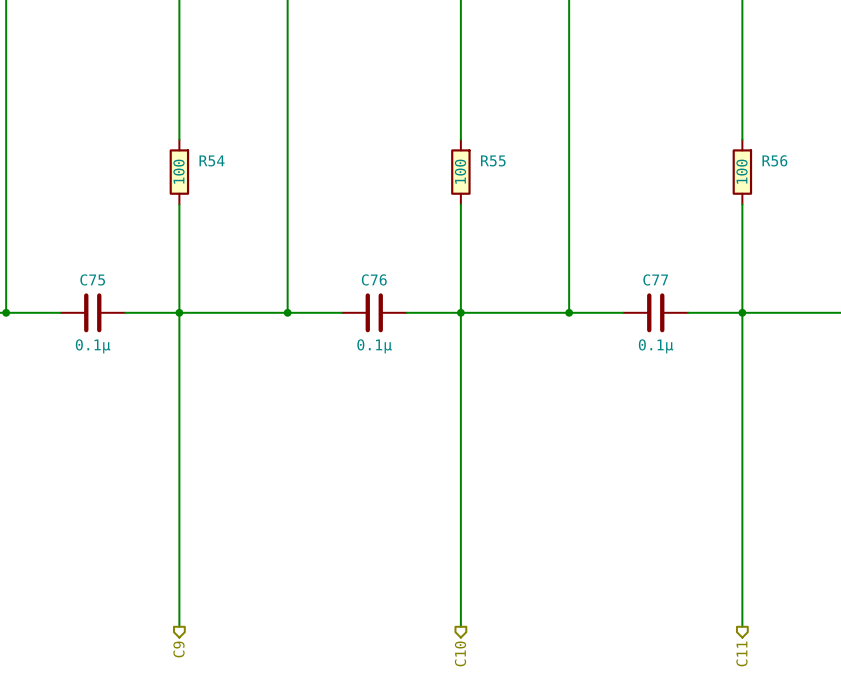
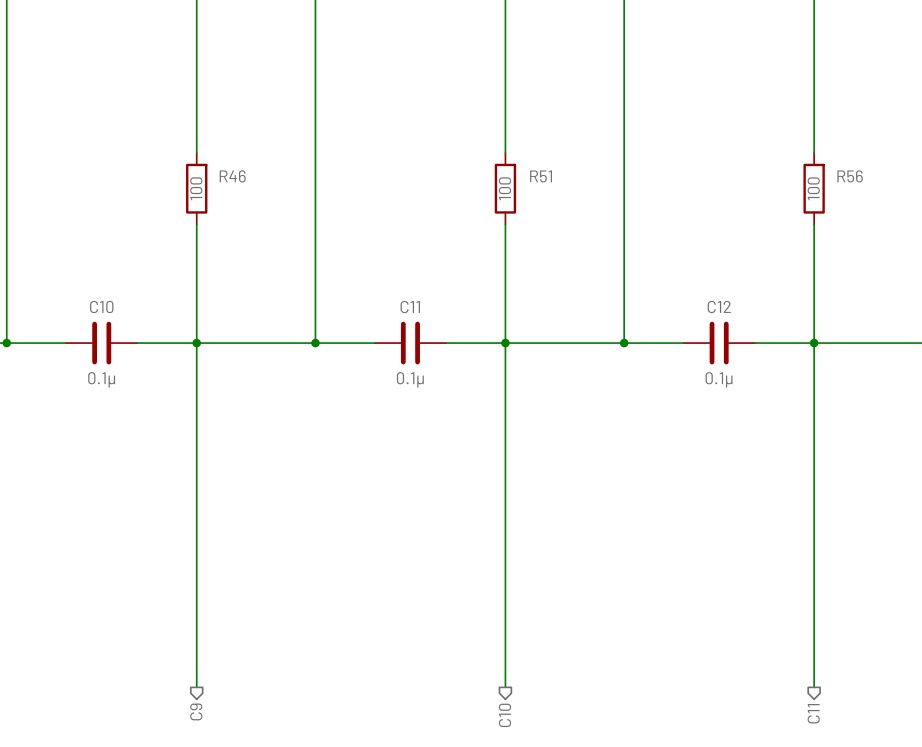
R54 name: R54 (212, 160) -> R46 (232, 176)
R55 name: R55 (493, 160) -> R51 (541, 176)
C75 name: C75 (92, 279) -> C10 (101, 307)
C76 name: C76 (374, 279) -> C11 (410, 307)
C77 name: C77 (655, 279) -> C12 (719, 307)

